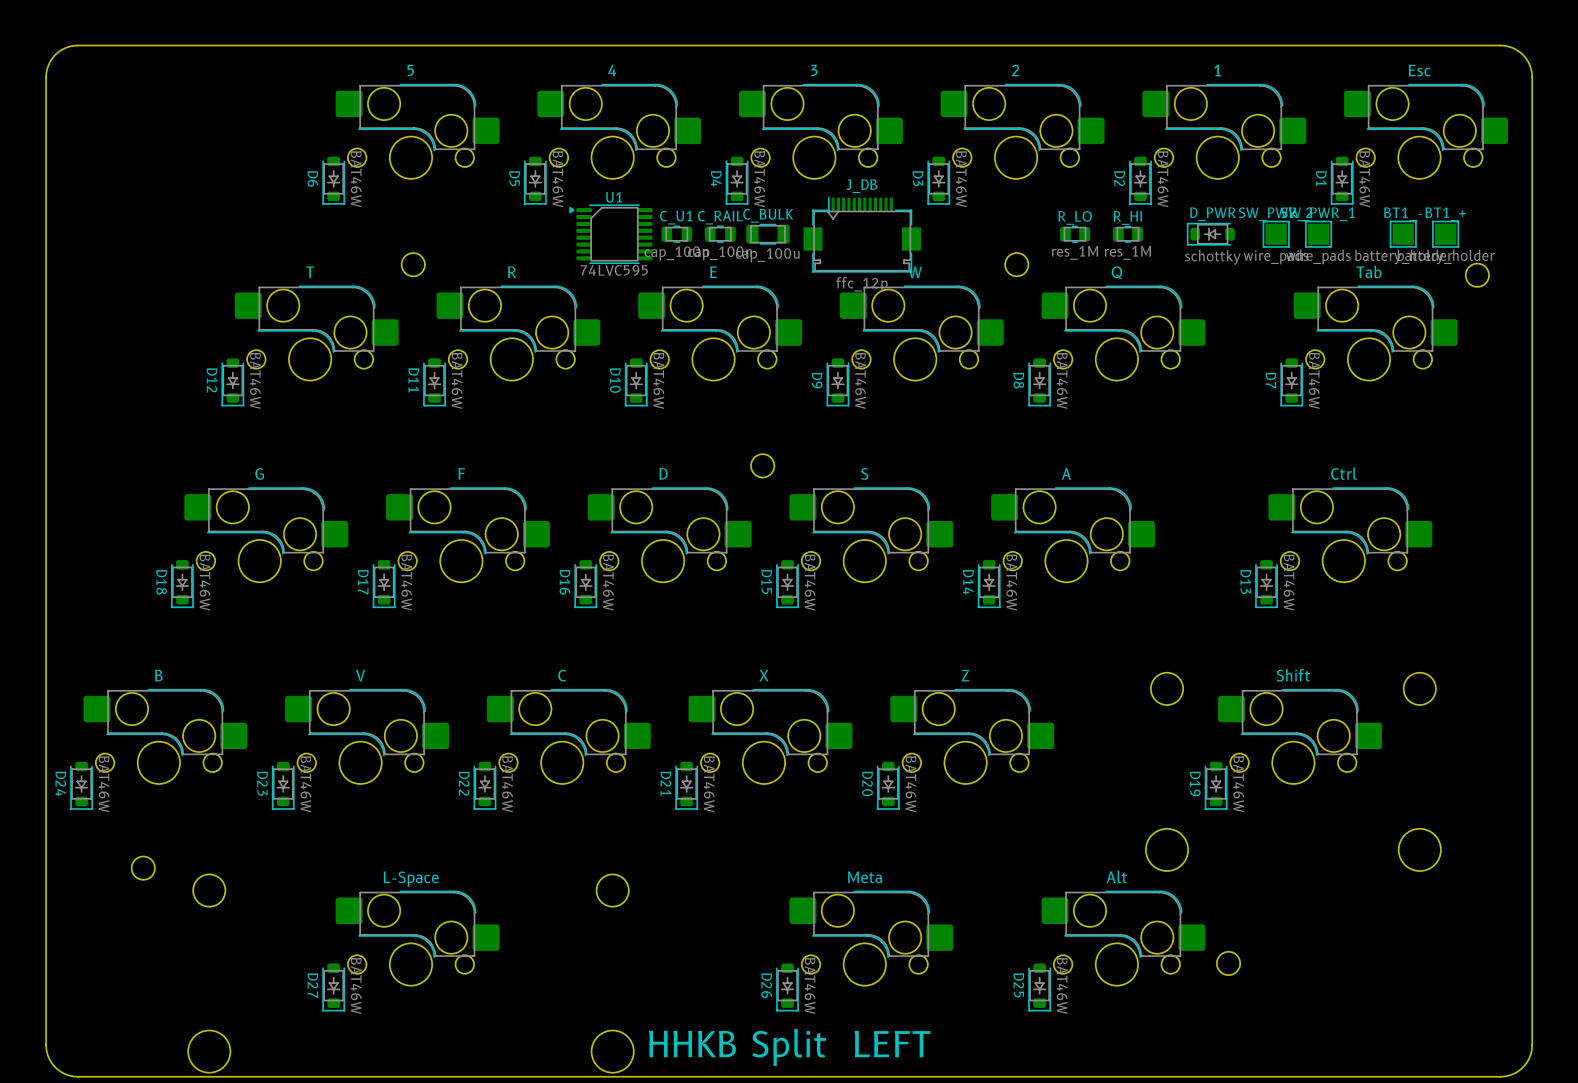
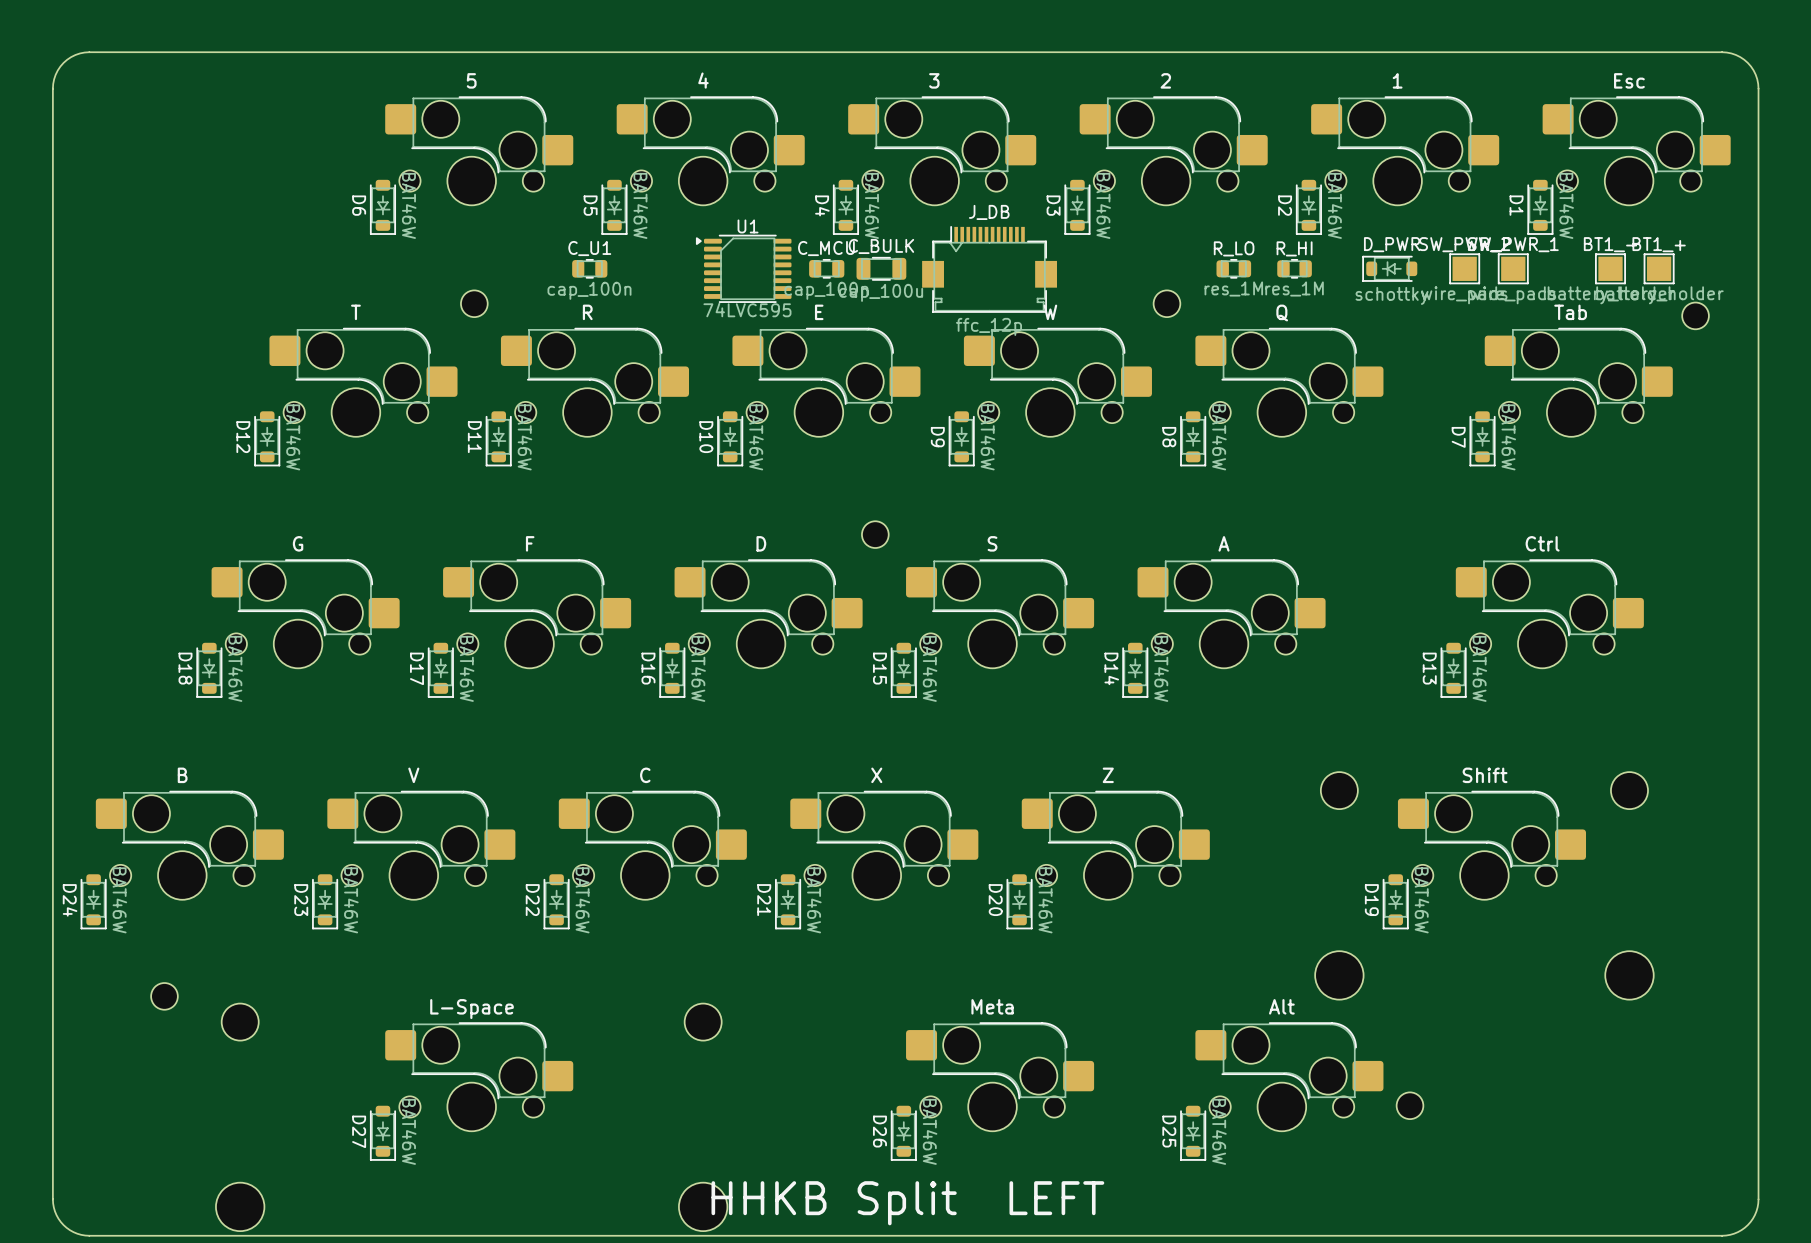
C_RAIL name: C_RAIL (720, 217) -> C_MCU (826, 248)
U1 position: (610, 234) -> (743, 268)
C_U1 position: (676, 234) -> (589, 268)

